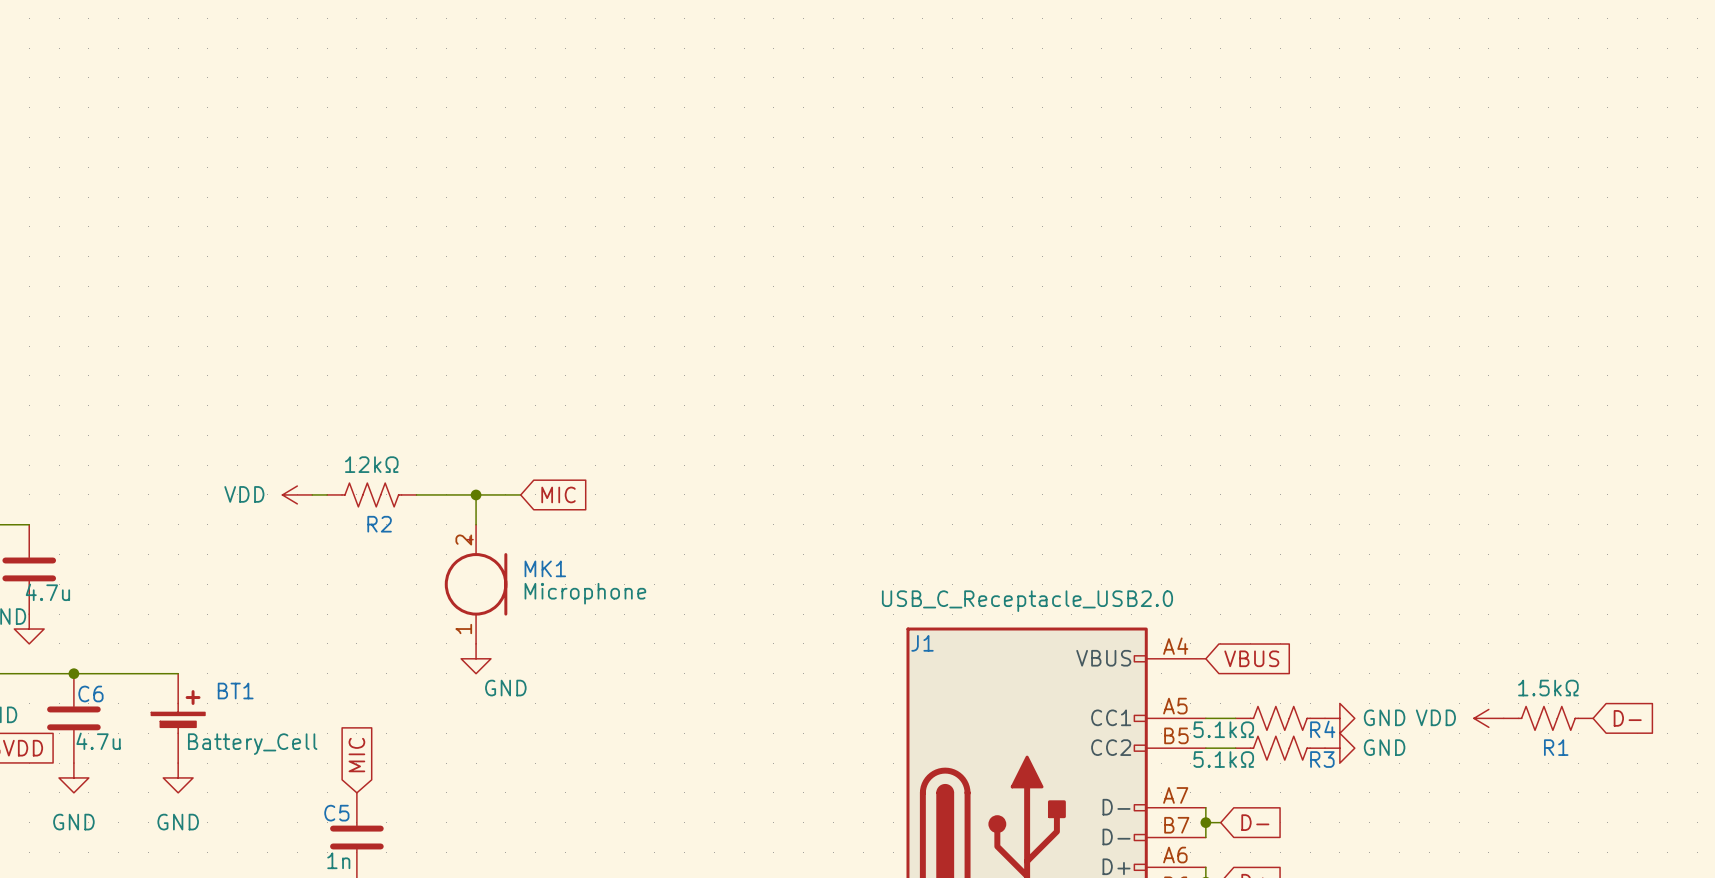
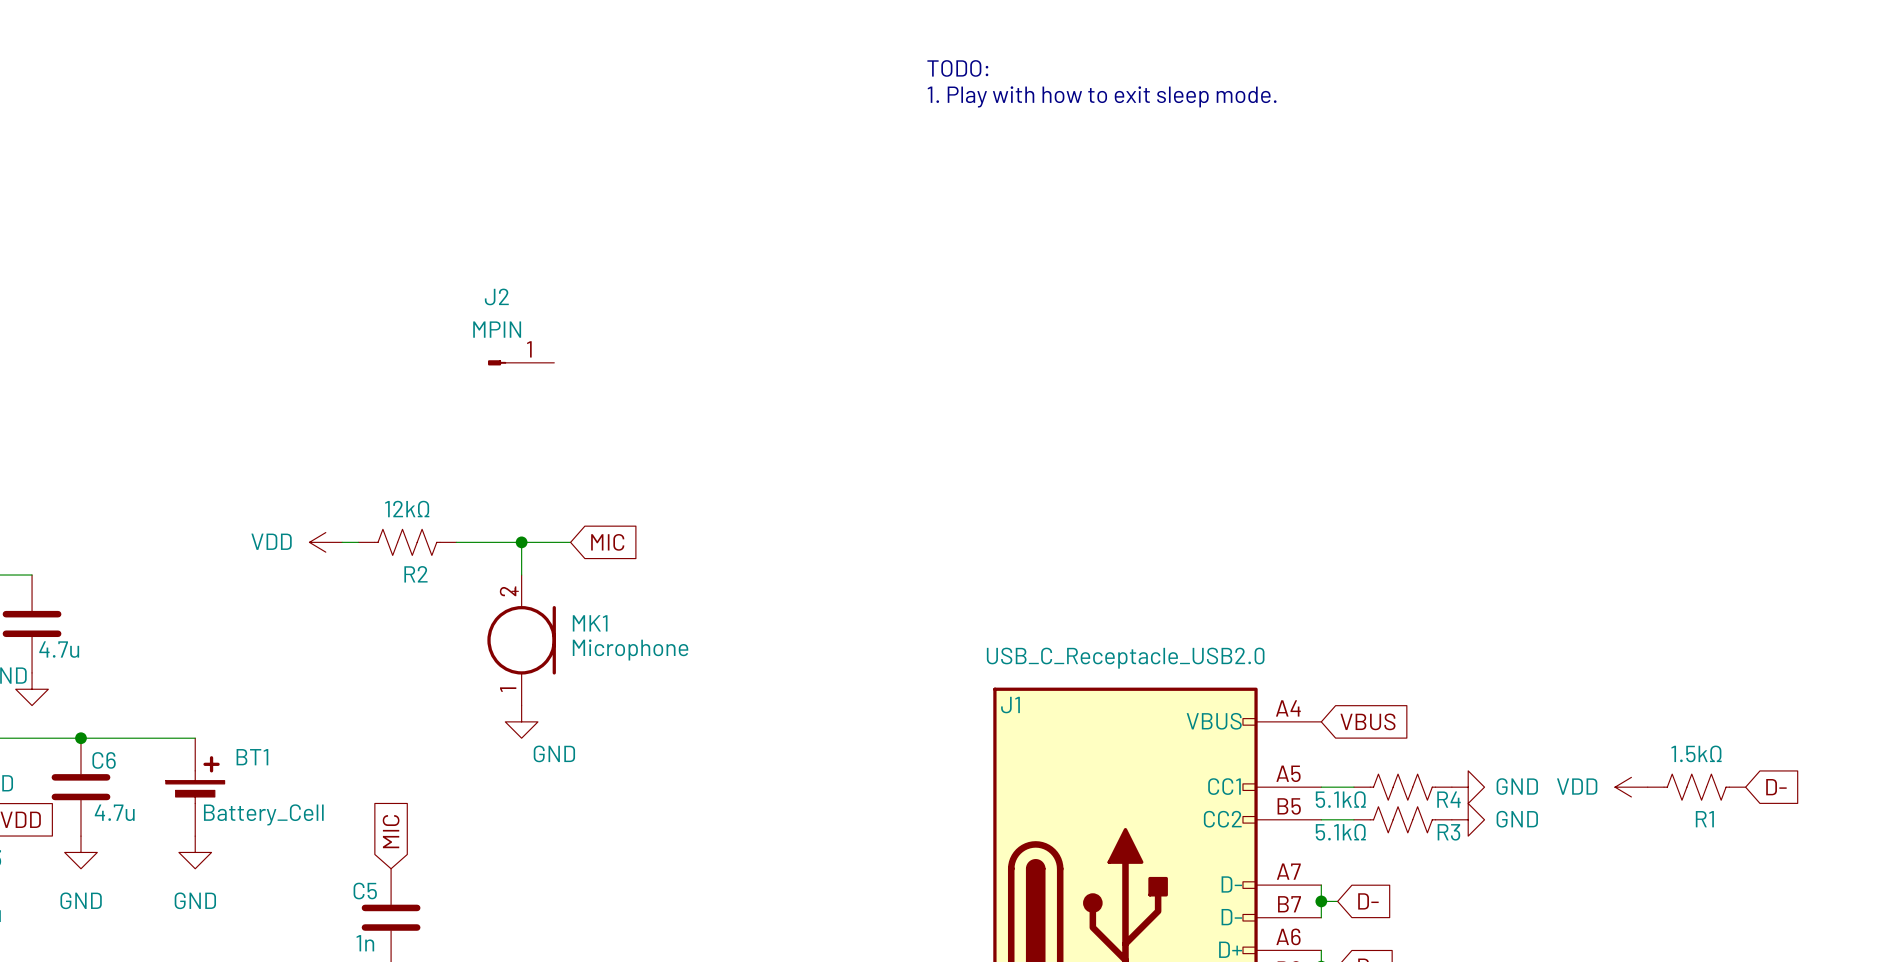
text: none -> TODO: (957, 68)
text: none -> 1. Play with how to exit sleep mode. (1102, 96)
J2: none -> MPIN (521, 362)

